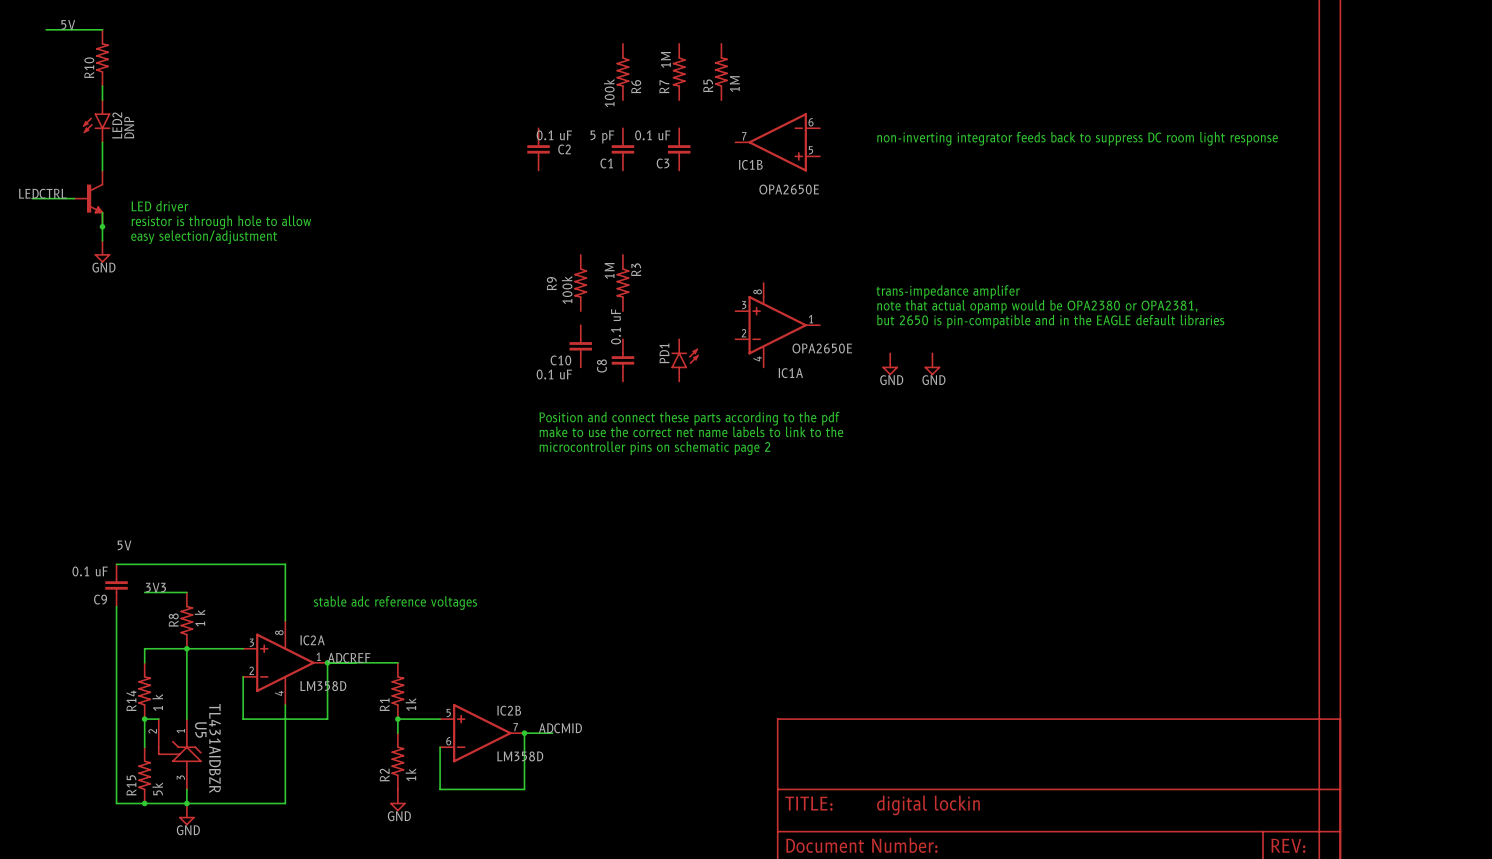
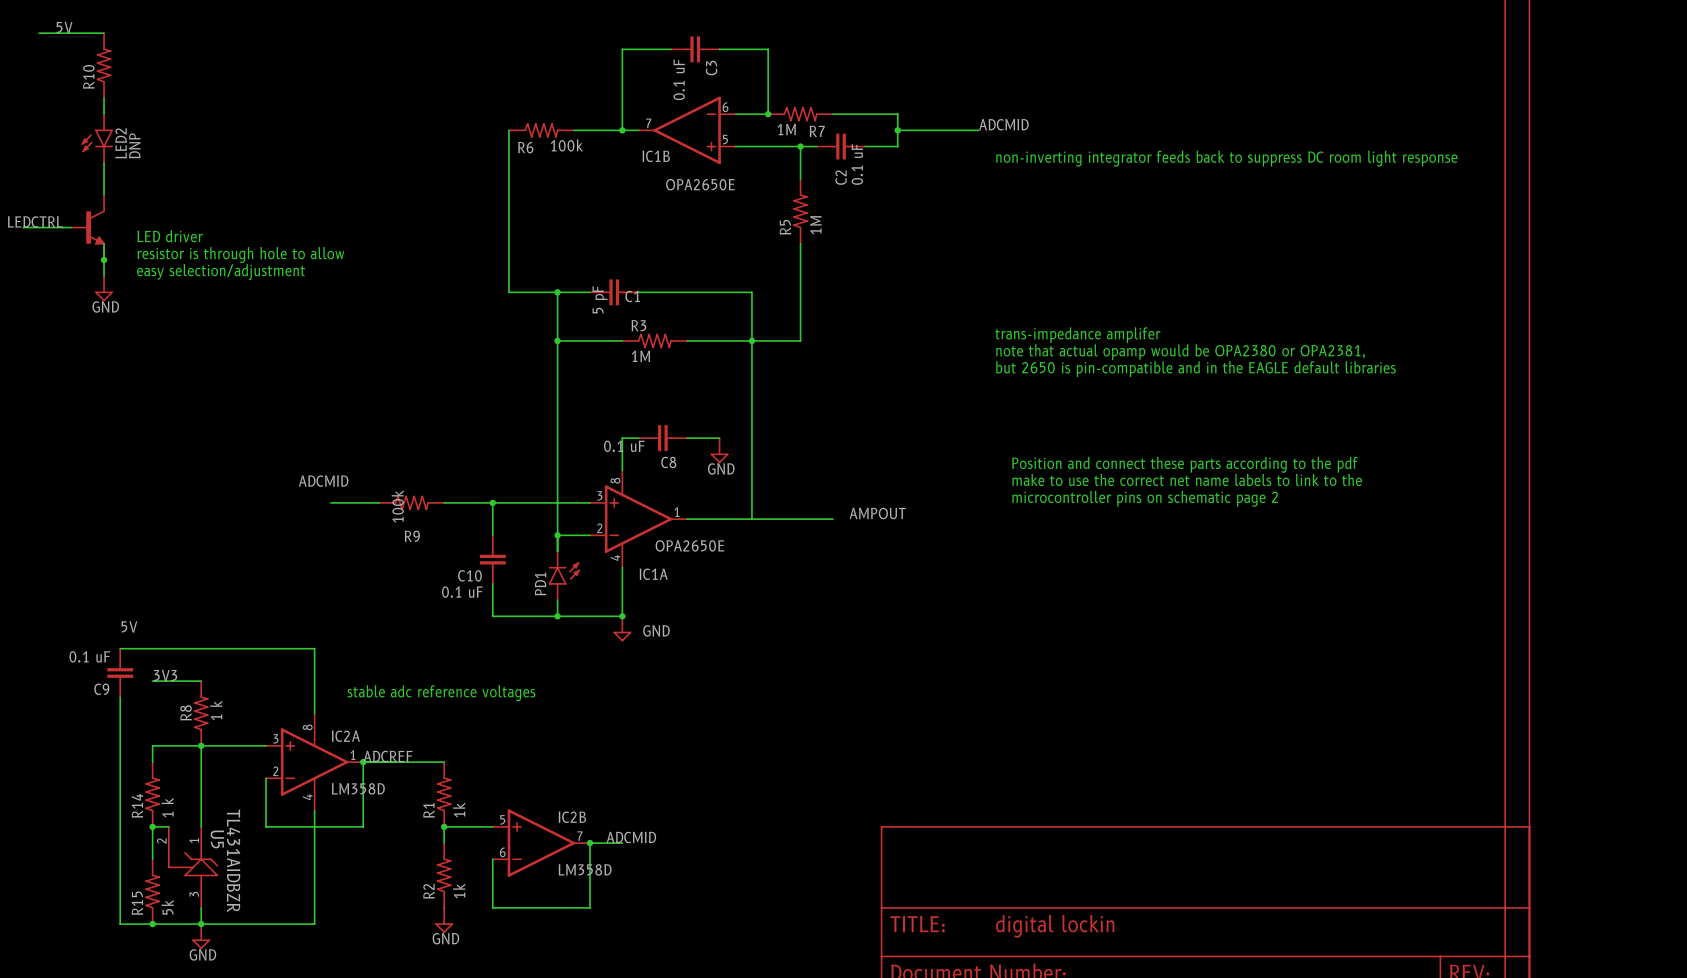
wire: none -> (670, 49) (622, 49) (622, 130)
wire: none -> (719, 49) (768, 49) (768, 114) (735, 114)
R6 rotation: 0° (622, 72) -> 90° counterclockwise (541, 130)
R6 position: (622, 72) -> (541, 130)
R7 rotation: 0° (679, 72) -> 90° counterclockwise (800, 114)
R7 position: (679, 72) -> (800, 114)
R5 position: (721, 72) -> (800, 211)
R6 name position: R6 (636, 86) -> R6 (525, 147)
junction: none -> (768, 114)
wire: none -> (832, 114) (897, 114) (897, 146) (865, 146)
label: none -> ADCMID (1003, 124)
wire: none -> (508, 130) (508, 292) (589, 292)
wire: none -> (573, 130) (638, 130)
junction: none -> (622, 130)
wire: none -> (897, 130) (978, 130)
junction: none -> (897, 130)
wire: none -> (735, 146) (816, 146)
wire: none -> (800, 146) (800, 178)
junction: none -> (800, 146)
C3 value position: 0.1 uF (652, 135) -> 0.1 uF (679, 79)
C1 value position: 5 pF (602, 137) -> 5 pF (600, 299)
IC1B position: (777, 142) -> (687, 130)
C2 rotation: 0° (538, 149) -> 90° clockwise (841, 146)
C2 position: (538, 149) -> (841, 146)
C1 rotation: 0° (622, 149) -> 90° clockwise (614, 292)
C1 position: (622, 149) -> (614, 292)
C3 rotation: 0° (679, 149) -> 90° clockwise (695, 49)
C3 position: (679, 149) -> (695, 49)
C1 name position: C1 (606, 163) -> C1 (632, 296)
C3 name position: C3 (663, 163) -> C3 (711, 67)
wire: none -> (800, 243) (800, 340) (687, 340)
wire: none -> (557, 292) (557, 551)
junction: none -> (557, 292)
wire: none -> (638, 292) (751, 292) (751, 519)
R9 rotation: 0° (580, 283) -> 90° counterclockwise (411, 502)
R9 position: (580, 283) -> (411, 502)
R3 rotation: 0° (622, 283) -> 90° counterclockwise (654, 340)
R3 position: (622, 283) -> (654, 340)
R9 value position: 100k (567, 289) -> 100k (397, 506)
wire: none -> (557, 340) (622, 340)
junction: none -> (557, 340)
junction: none -> (751, 340)
IC1A position: (777, 325) -> (638, 519)
C8 value position: 0.1 uF (615, 326) -> 0.1 uF (624, 446)
C10 position: (580, 346) -> (492, 559)
PD1 name position: PD1 (664, 353) -> PD1 (540, 584)
C8 rotation: 0° (622, 360) -> 90° clockwise (662, 438)
C8 position: (622, 360) -> (662, 438)
PD1 position: (685, 360) -> (564, 575)
power symbol: GND (890, 364) -> none
power symbol: GND (932, 364) -> none
C8 name position: C8 (601, 365) -> C8 (668, 462)
wire: none -> (638, 438) (622, 438) (622, 470)
wire: none -> (687, 438) (719, 438)
power symbol: none -> GND (719, 450)
text: none -> Position and connect these parts according to the pdf (1184, 464)
text: none -> make to use the correct net name labels to link to the (1187, 479)
label: none -> ADCMID (323, 481)
text: Position and connect these parts according to the pdf (689, 418) -> none
text: make to use the correct net name labels to link to the (691, 431) -> none
text: none -> microcontroller pins on schematic page 2 (1145, 498)
wire: none -> (330, 502) (379, 502)
wire: none -> (444, 502) (589, 502)
wire: none -> (492, 502) (492, 535)
junction: none -> (492, 502)
label: none -> AMPOUT (877, 513)
text: microcontroller pins on schematic page 2 (655, 448) -> none
wire: none -> (687, 519) (832, 519)
wire: none -> (557, 535) (589, 535)
junction: none -> (557, 535)
wire: none -> (622, 567) (622, 616) (492, 616) (492, 583)
wire: none -> (557, 600) (557, 616)
junction: none -> (557, 616)
junction: none -> (622, 616)
power symbol: none -> GND (622, 628)

